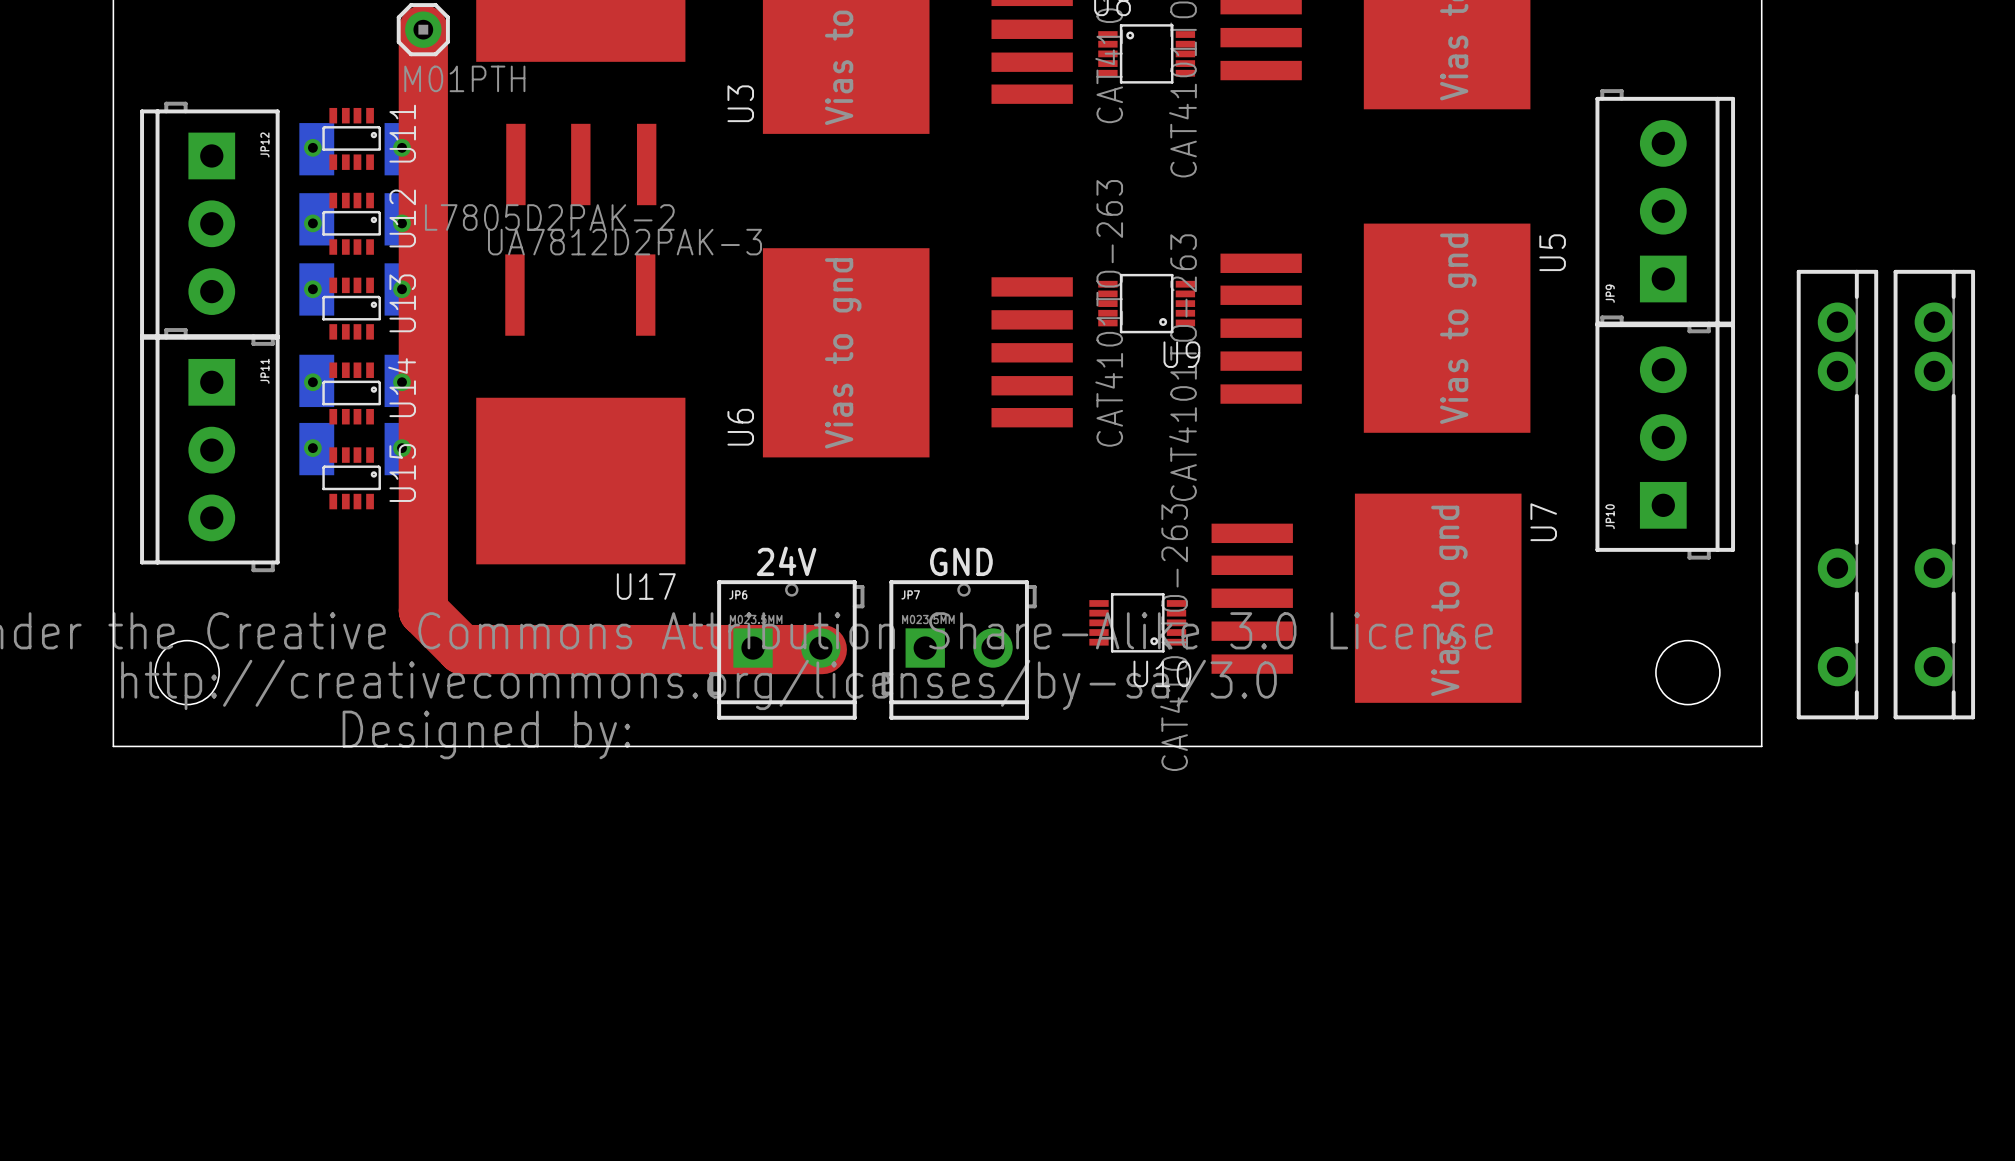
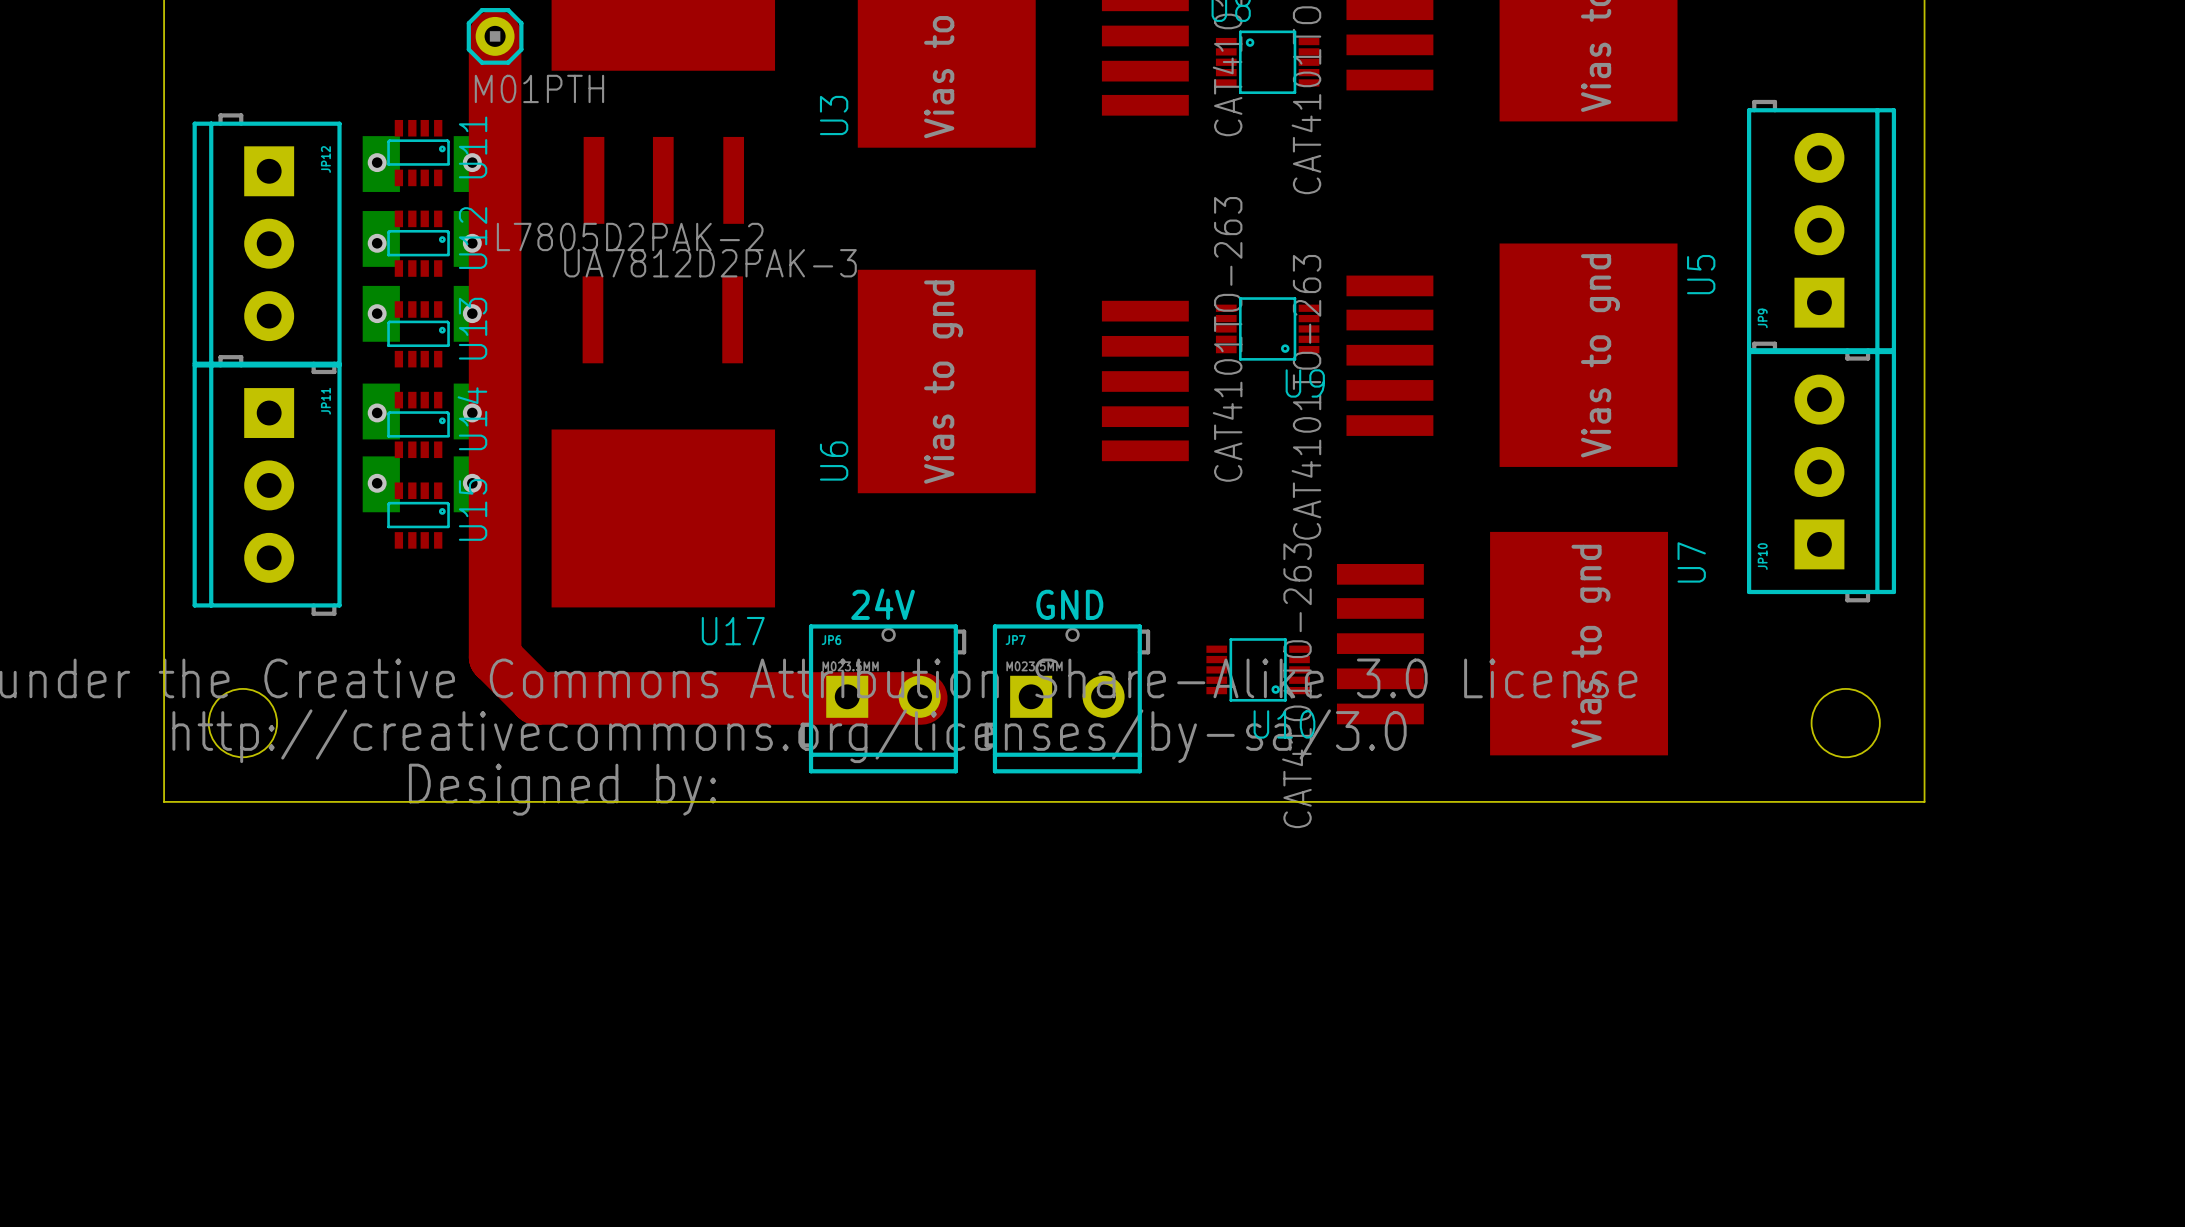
part: (1837, 494) -> none
part: (1934, 494) -> none

